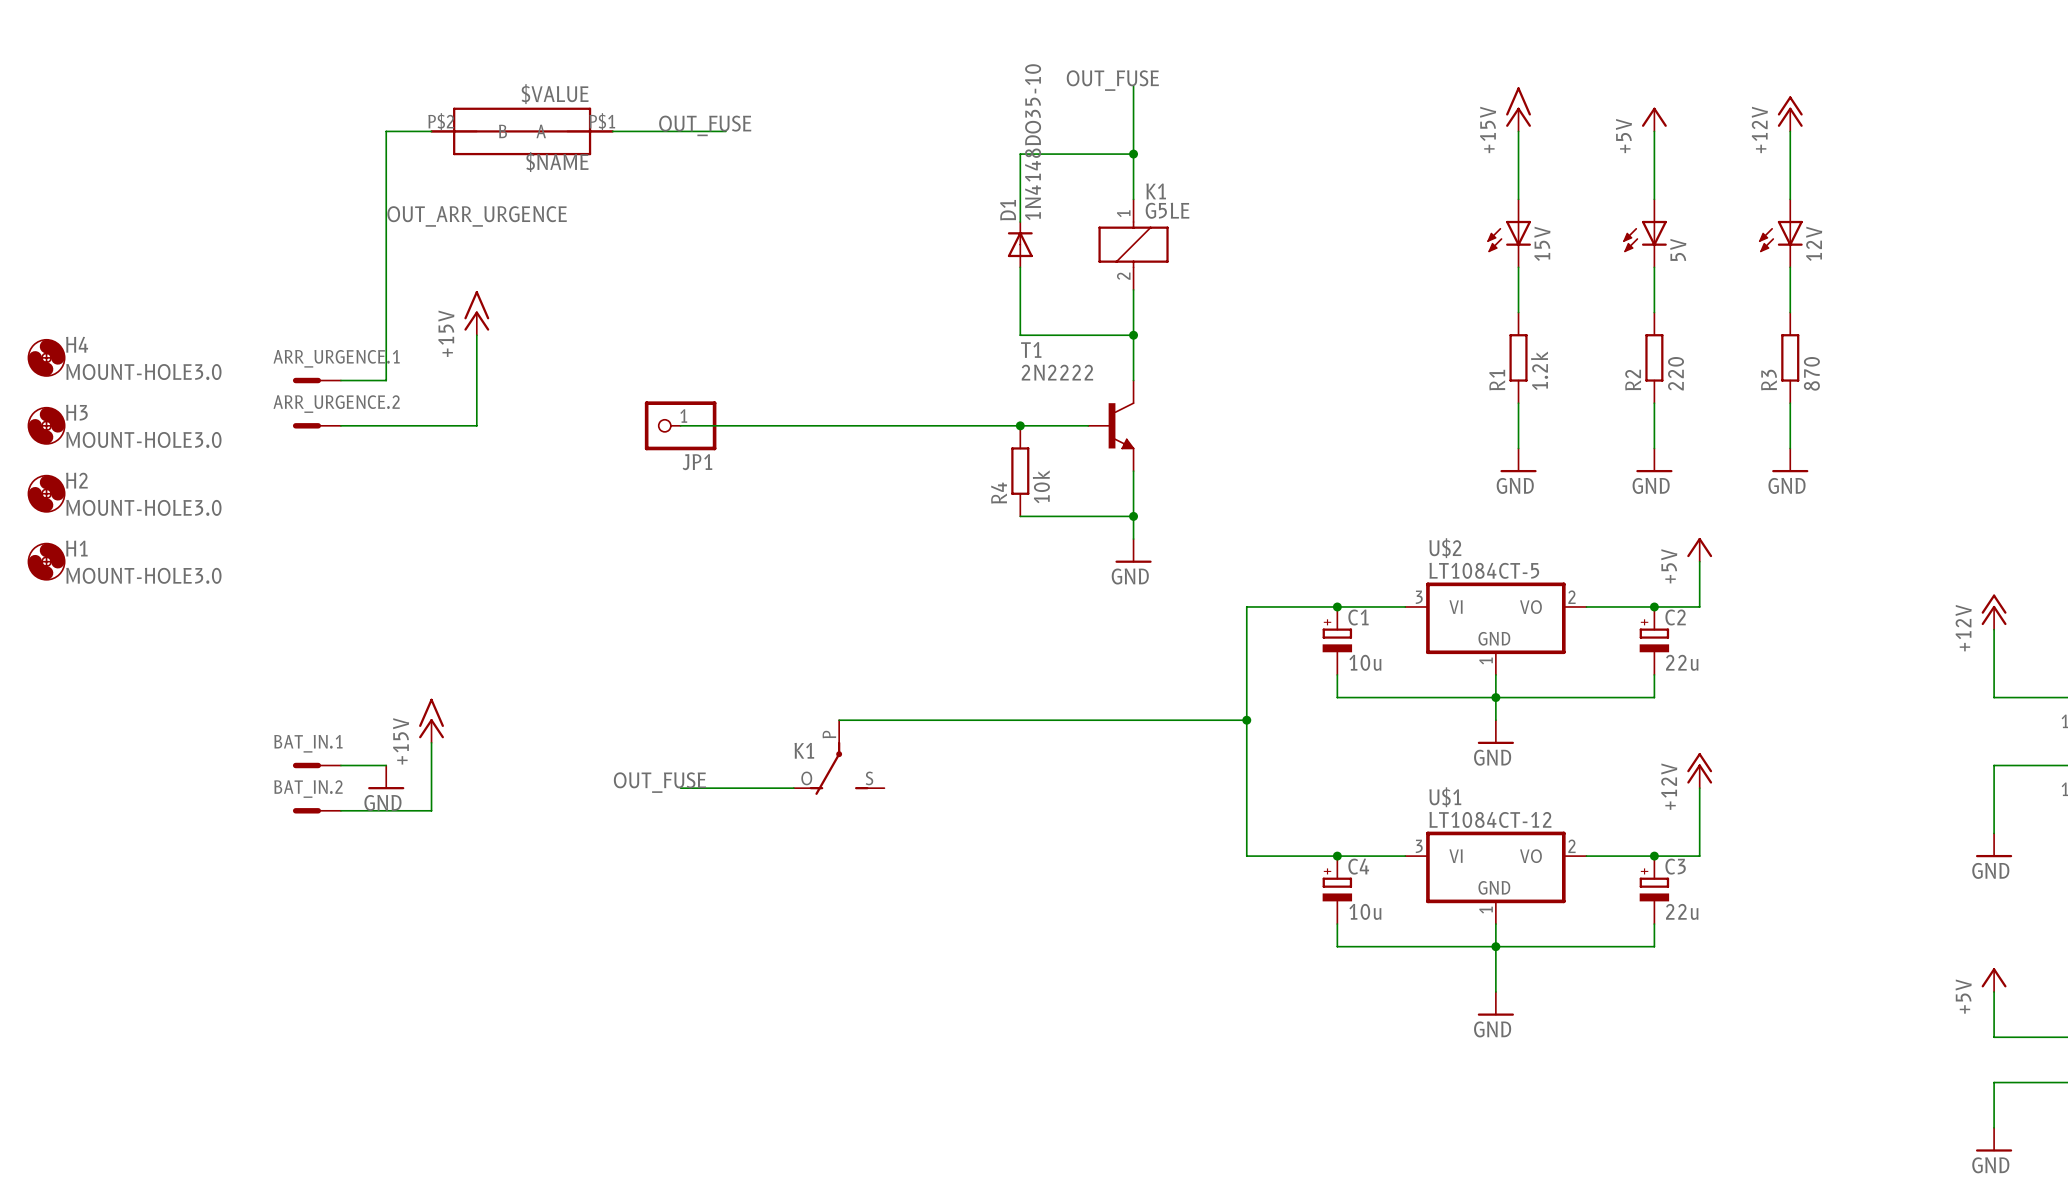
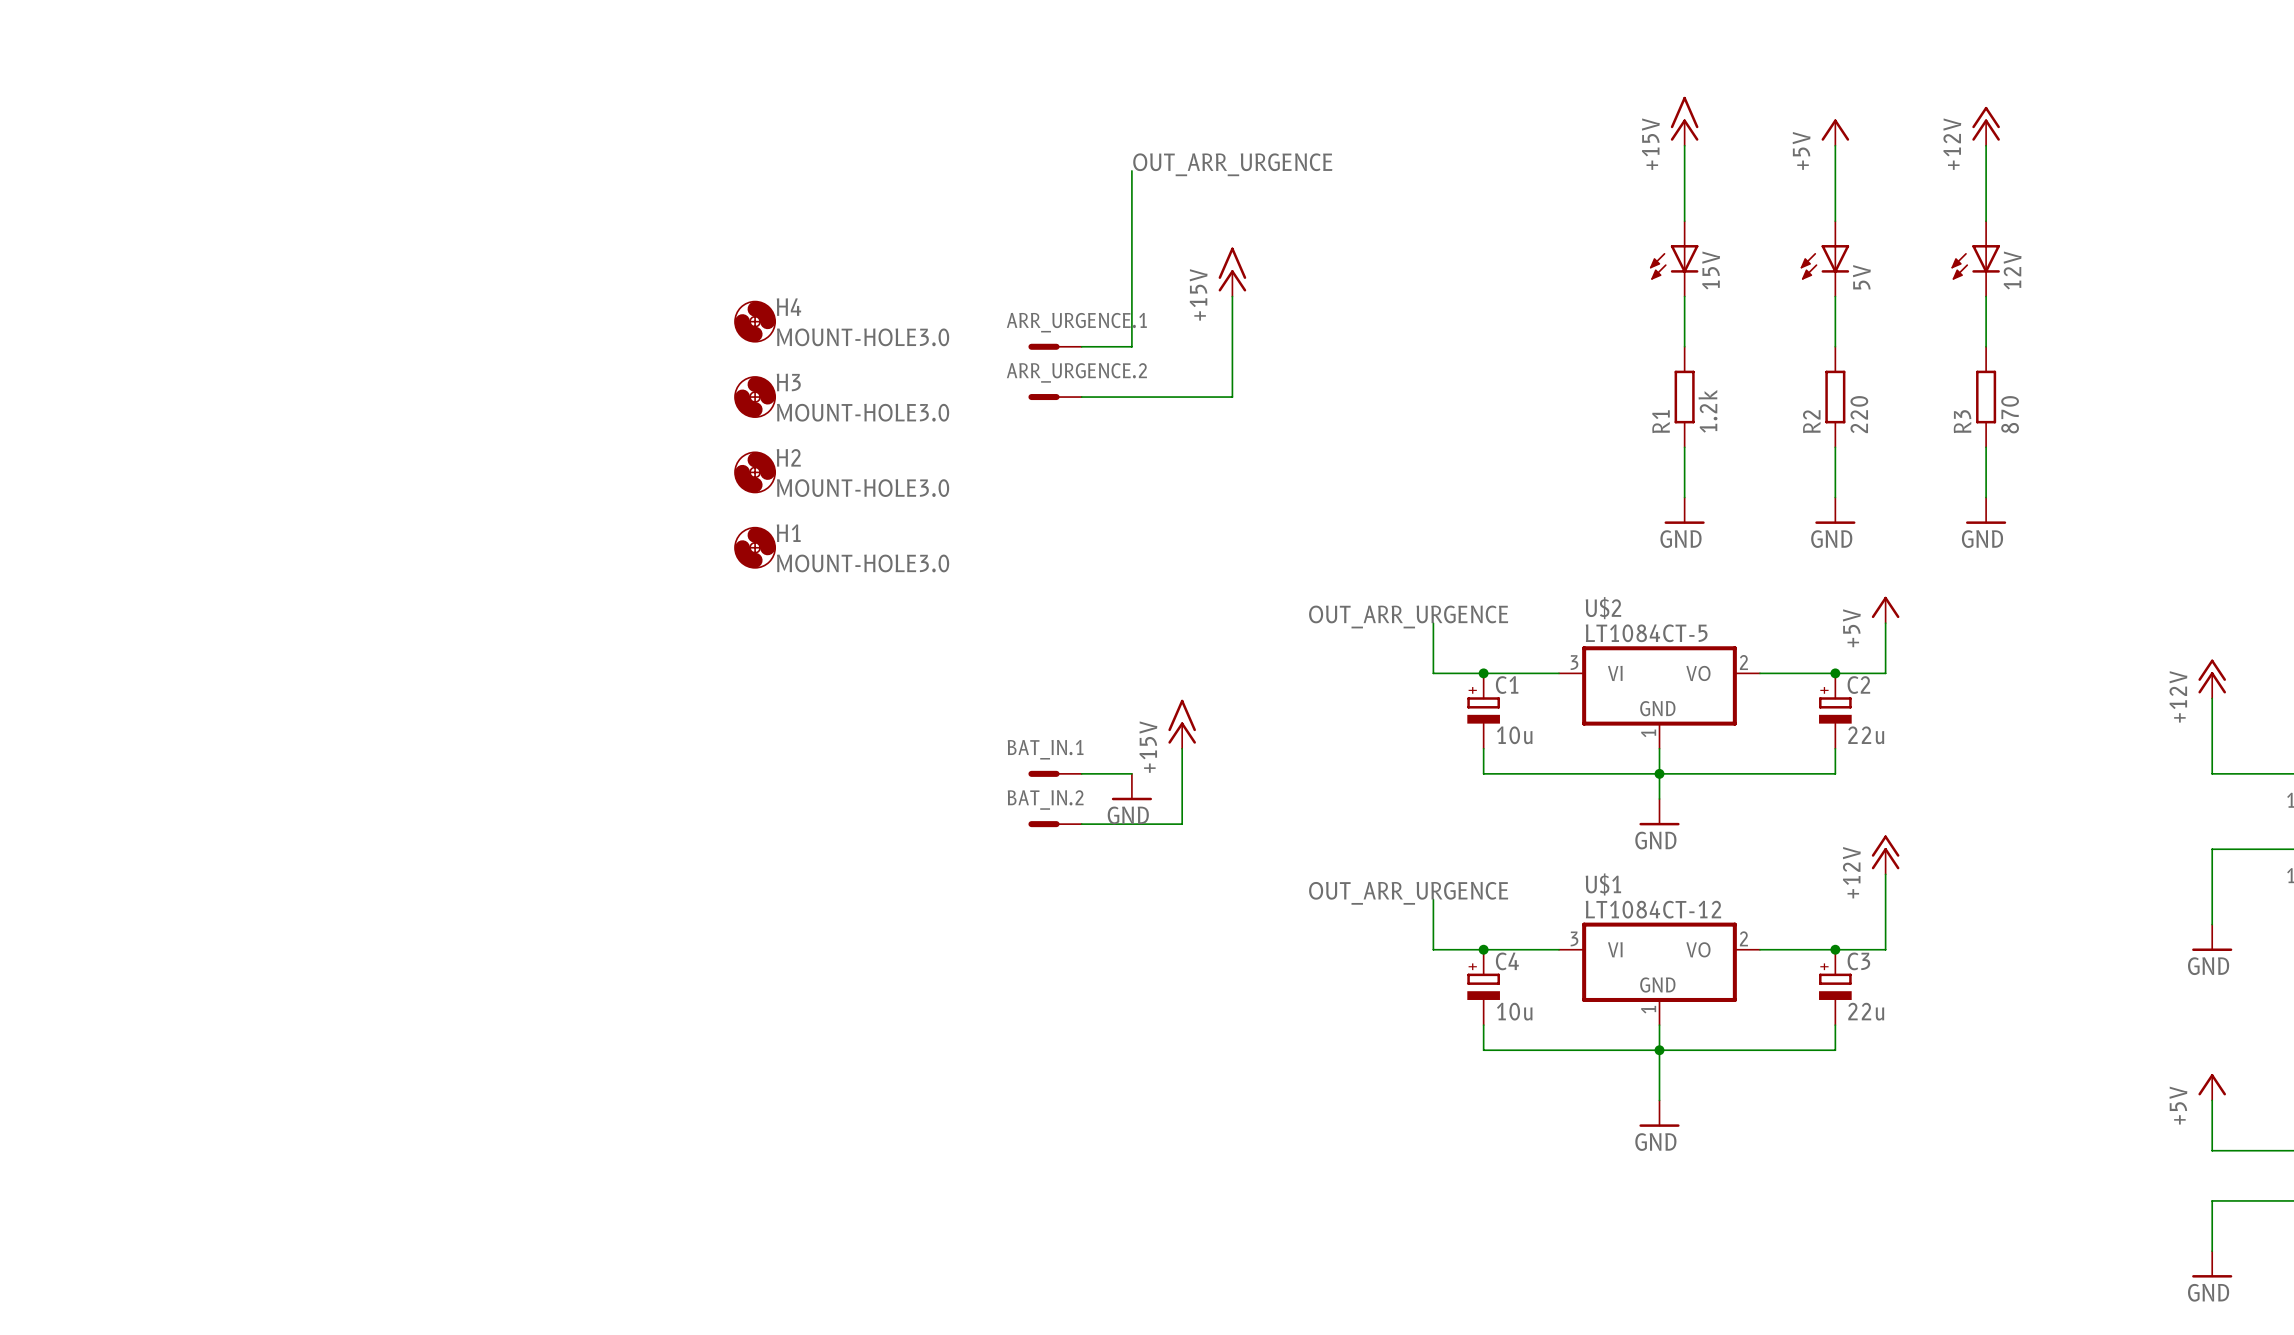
label: OUT_FUSE (1112, 80) -> none
wire: (1133, 86) (1133, 199) -> none
label: OUT_FUSE (705, 125) -> none
wire: (431, 131) (386, 131) (386, 380) (340, 380) -> none
part: (522, 131) -> none
wire: (612, 131) (725, 131) -> none
label: none -> OUT_ARR_URGENCE (1232, 164)
wire: (1020, 154) (1133, 154) -> none
junction: (1133, 154) -> none
label: OUT_ARR_URGENCE (477, 216) -> none
D1: 1N4148DO35-10 (1020, 244) -> none
K1: G5LE (1133, 244) -> none
power symbol: none -> +15V (1232, 272)
wire: none -> (1232, 296) (1232, 397) (1081, 397)
wire: (1133, 289) (1133, 380) -> none
wire: (1020, 312) (1020, 335) (1133, 335) -> (1131, 346) (1081, 346)
power symbol: +15V (476, 313) -> none
wire: (476, 335) (476, 425) (340, 425) -> none
junction: (1133, 335) -> none
H4 position: (46, 357) -> (755, 321)
ARR_URGENCE.1 position: (316, 380) -> (1055, 346)
H3 position: (46, 425) -> (755, 397)
ARR_URGENCE.2 position: (316, 425) -> (1055, 397)
wire: (680, 425) (1088, 425) -> none
JP1: (680, 425) -> none
junction: (1020, 425) -> none
T1: 2N2222 (1111, 425) -> none
R4: 10k (1020, 471) -> none
wire: (1133, 471) (1133, 539) -> none
H2 position: (46, 493) -> (755, 472)
wire: (1020, 516) (1133, 516) -> none
junction: (1133, 516) -> none
power symbol position: GND (1133, 550) -> GND (1131, 787)
label: none -> OUT_ARR_URGENCE (1408, 616)
H1 position: (46, 561) -> (755, 547)
wire: none -> (1433, 623) (1433, 673)
wire: (1292, 606) (1246, 606) (1246, 856) (1292, 856) -> (1433, 899) (1433, 949)
power symbol: none -> +15V (1182, 724)
wire: none -> (1182, 748) (1182, 824) (1081, 824)
wire: none -> (1081, 773) (1131, 773)
power symbol: +15V (431, 720) -> none
wire: (839, 720) (1246, 720) -> none
junction: (1246, 720) -> none
wire: (431, 742) (431, 810) (340, 810) -> none
K1: (839, 757) -> none
BAT_IN.1 position: (316, 765) -> (1055, 773)
wire: (340, 765) (386, 765) -> none
power symbol: GND (386, 777) -> none
label: OUT_FUSE (659, 782) -> none
wire: (680, 788) (793, 788) -> none
label: none -> OUT_ARR_URGENCE (1408, 893)
BAT_IN.2 position: (316, 810) -> (1055, 824)

